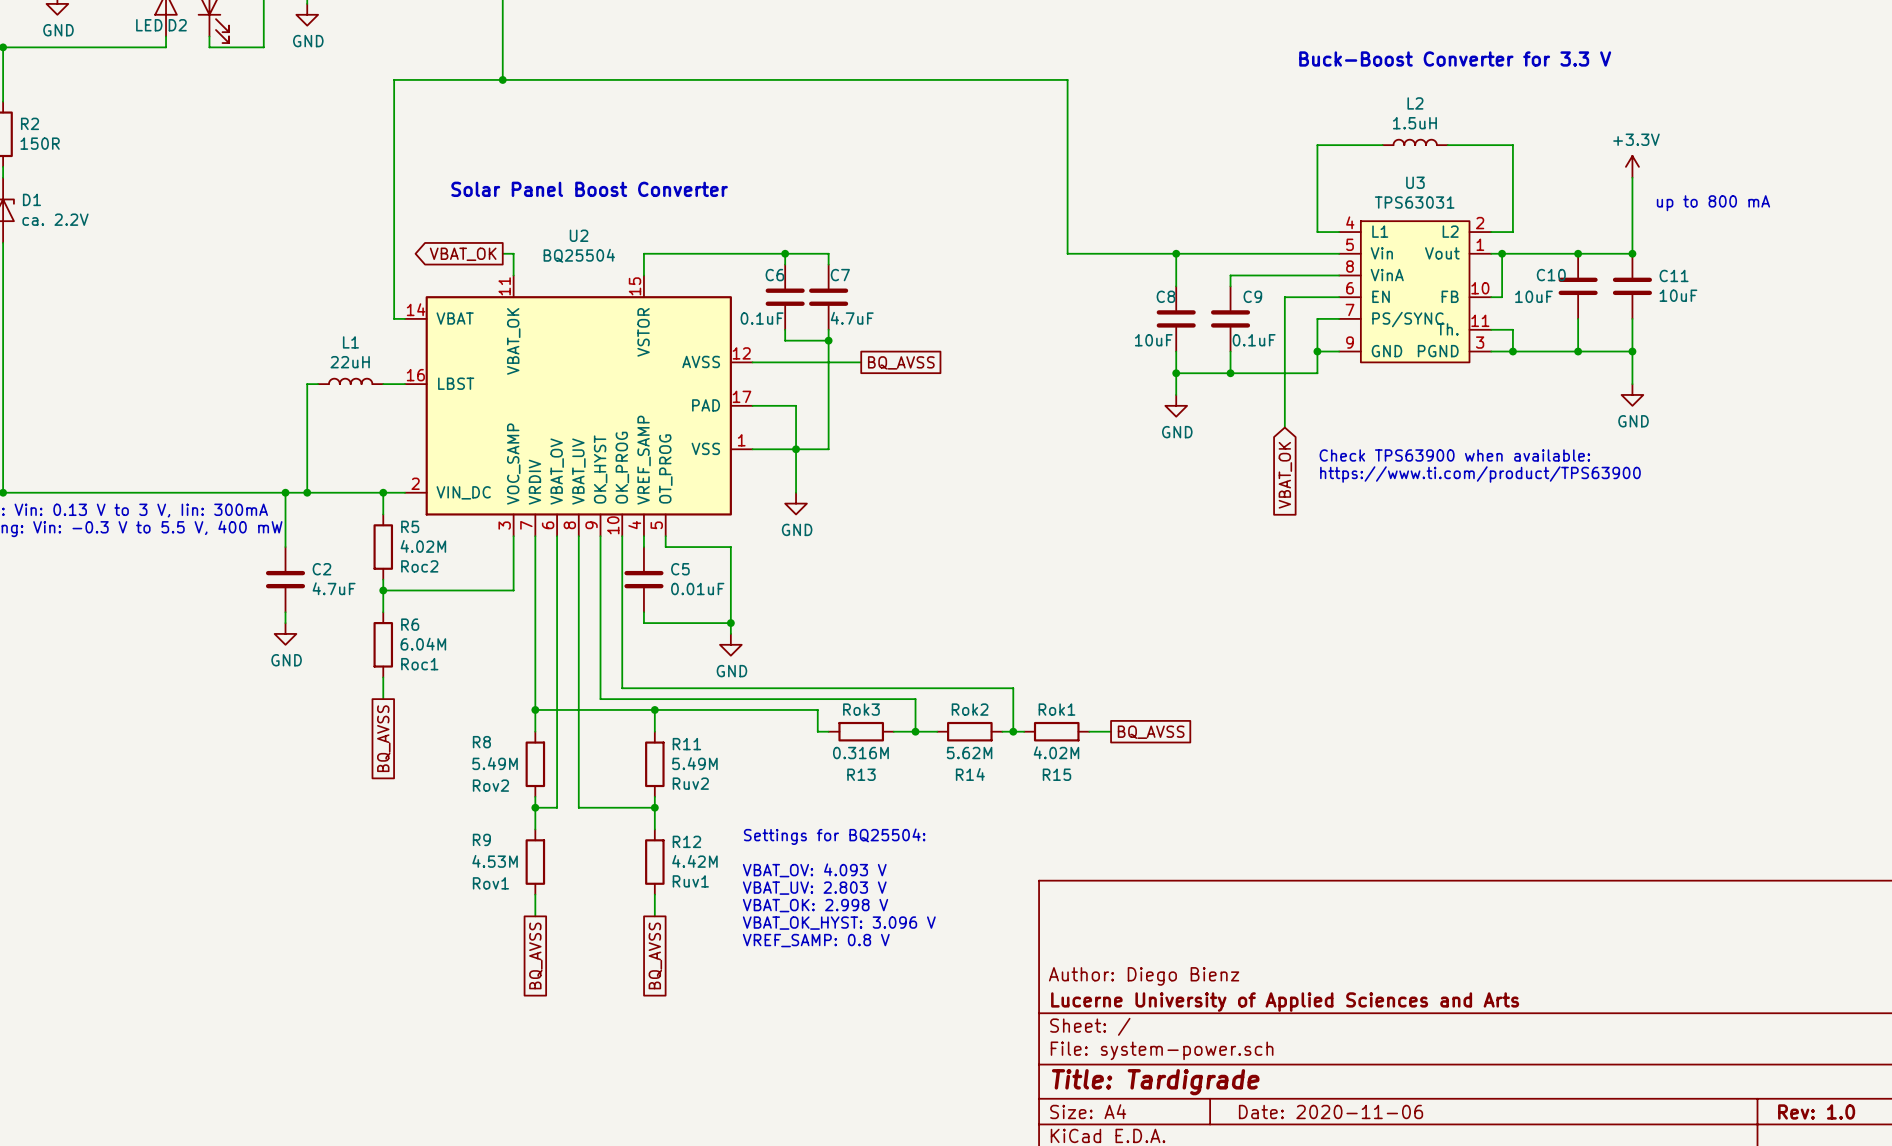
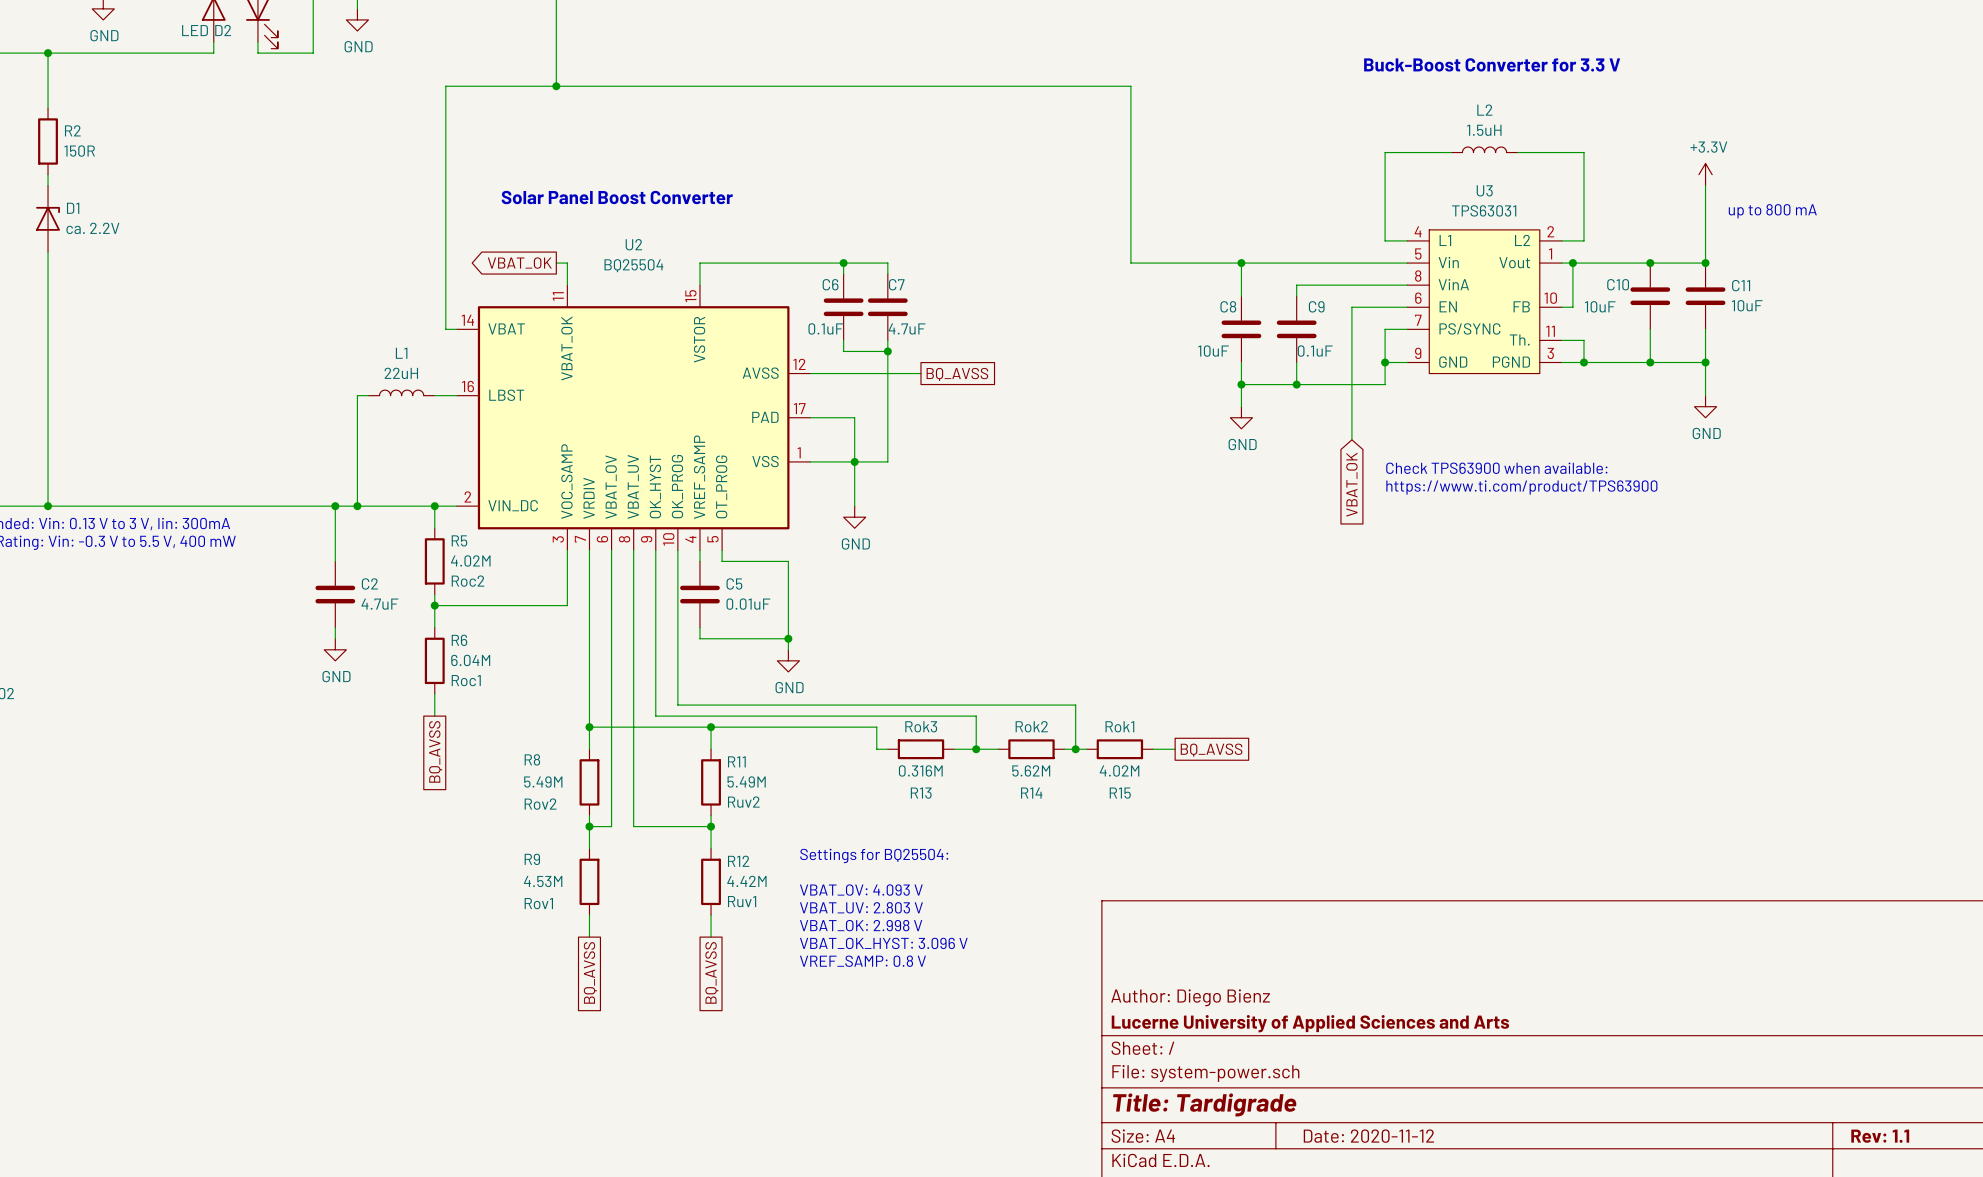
title block: Date: 2020-11-06 (1331, 1111) -> Date: 2020-11-12 (1368, 1136)
title block: Rev: 1.0 (1816, 1111) -> Rev: 1.1 (1880, 1136)

